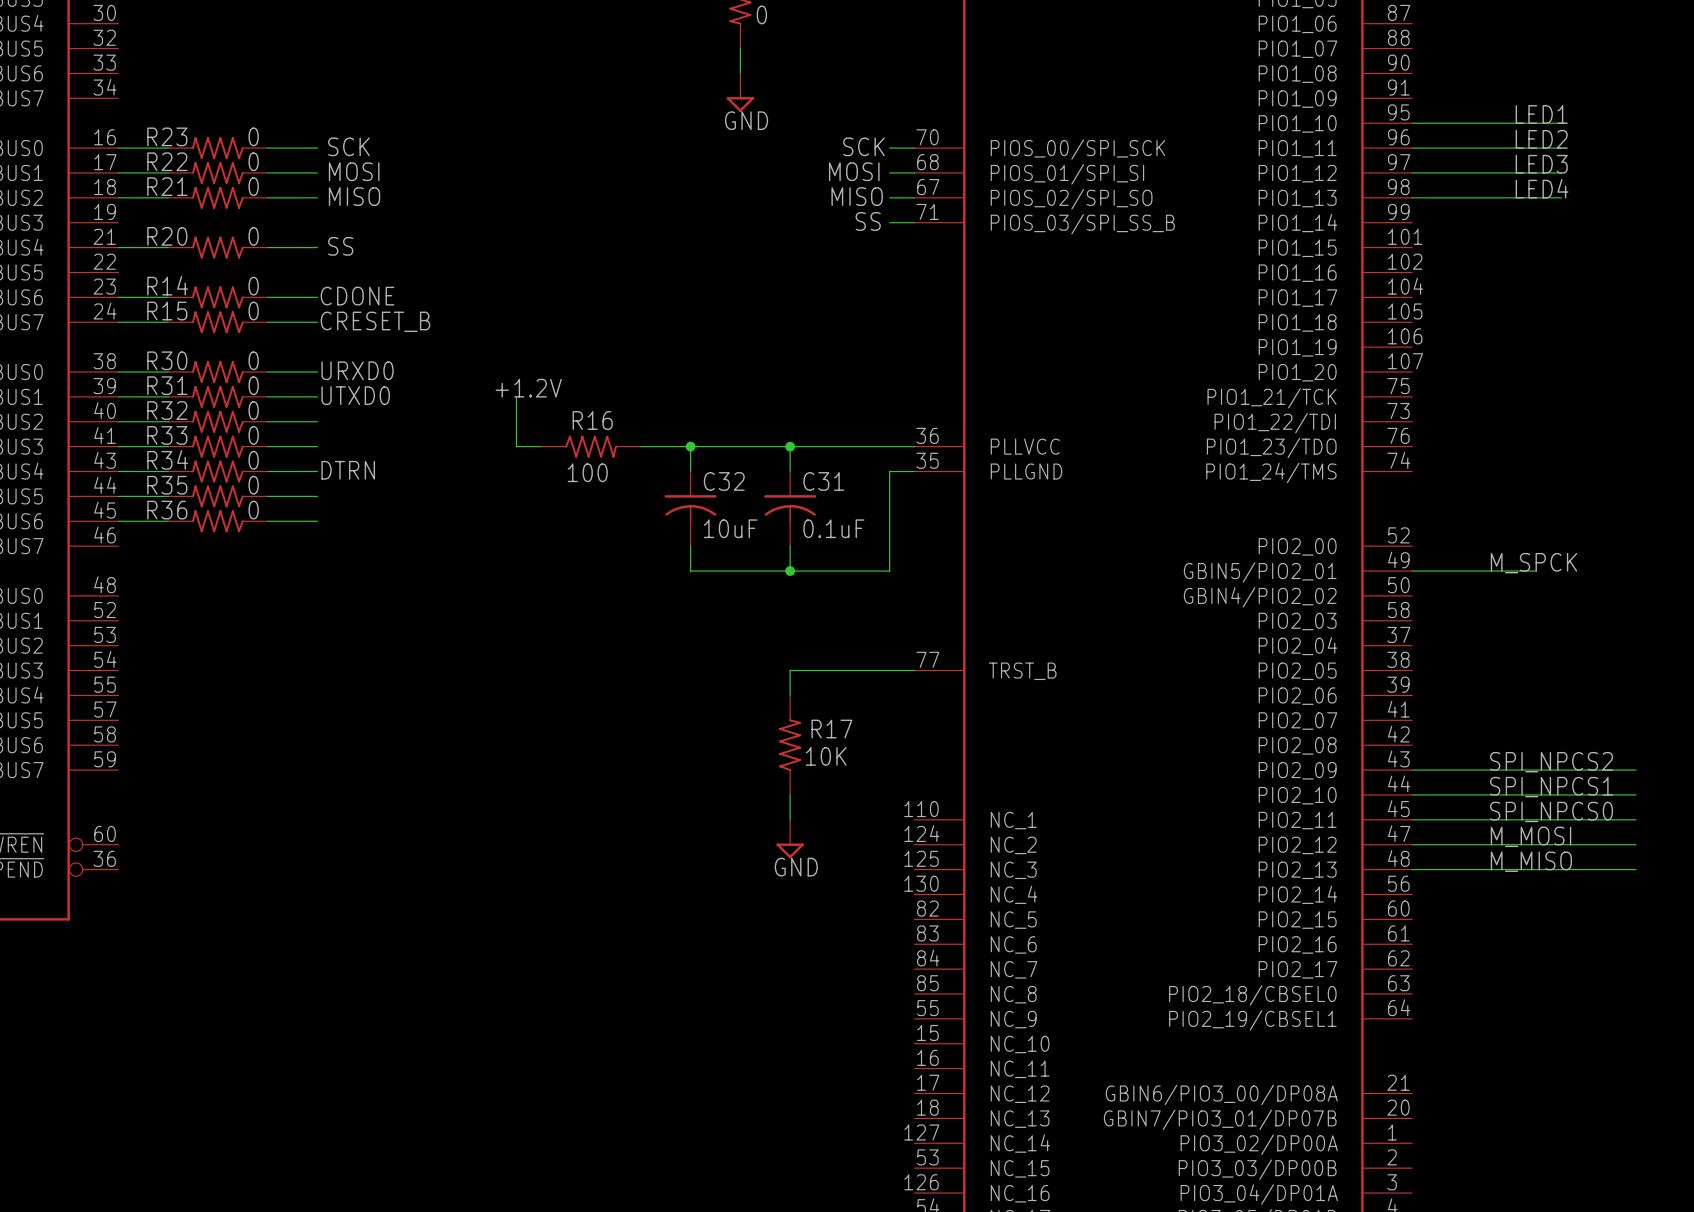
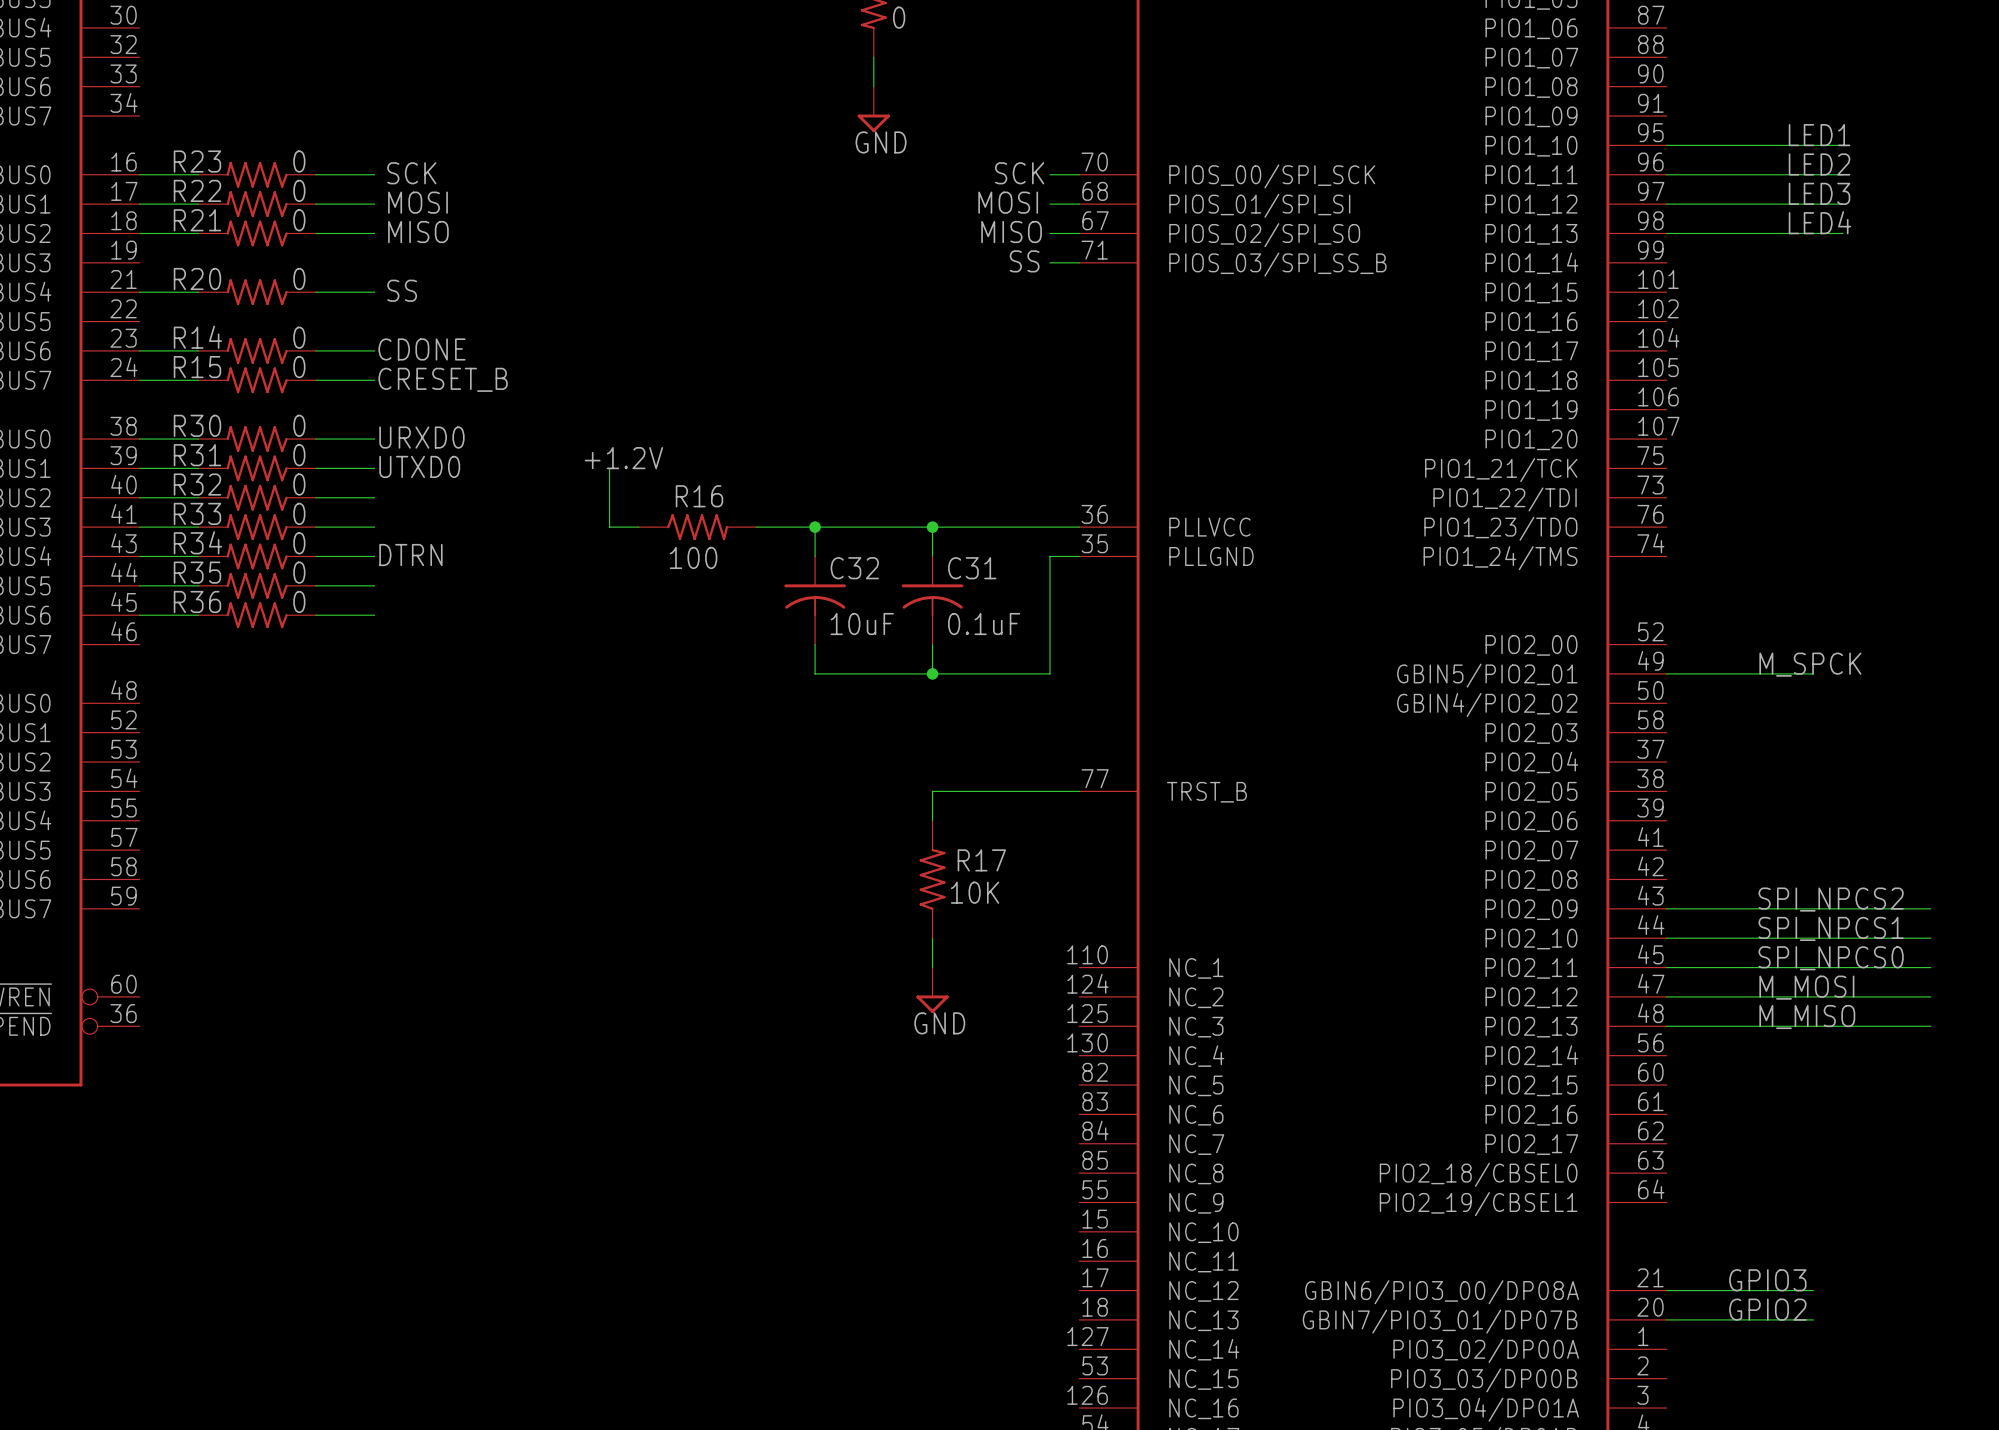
label: none -> GPIO3 (1767, 1280)
wire: none -> (1666, 1290) (1813, 1290)
label: none -> GPIO2 (1767, 1309)
wire: none -> (1666, 1319) (1813, 1319)

